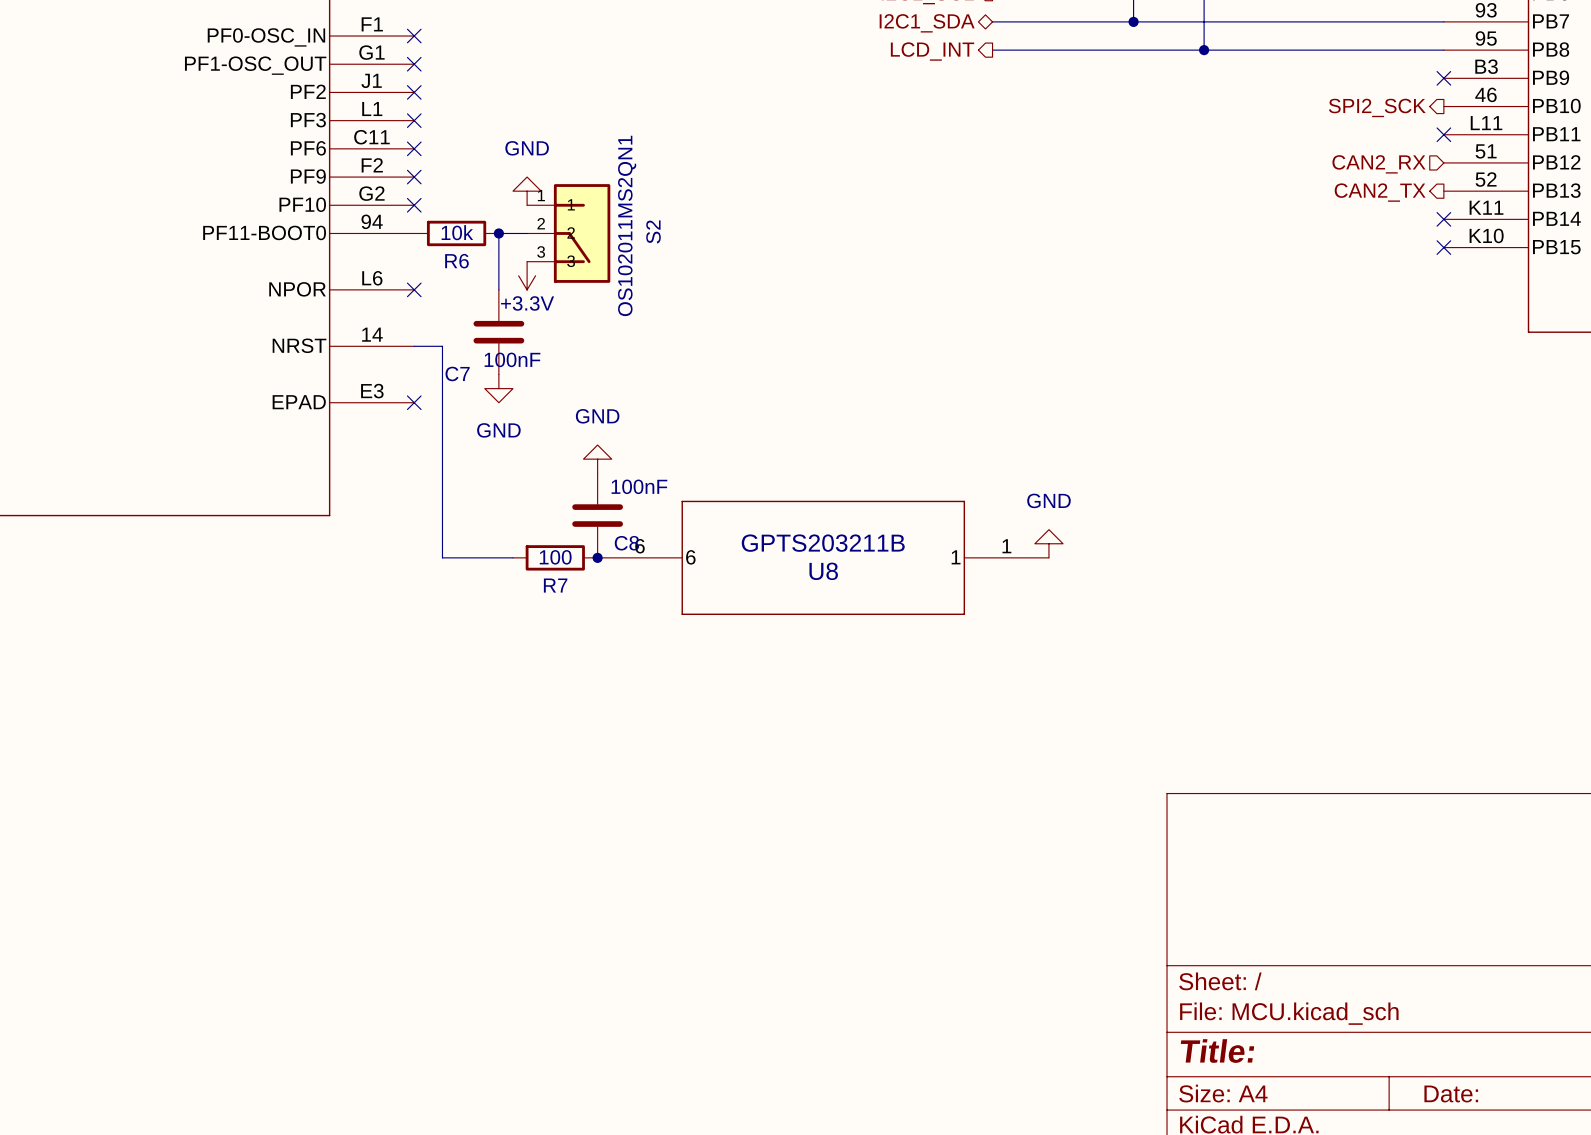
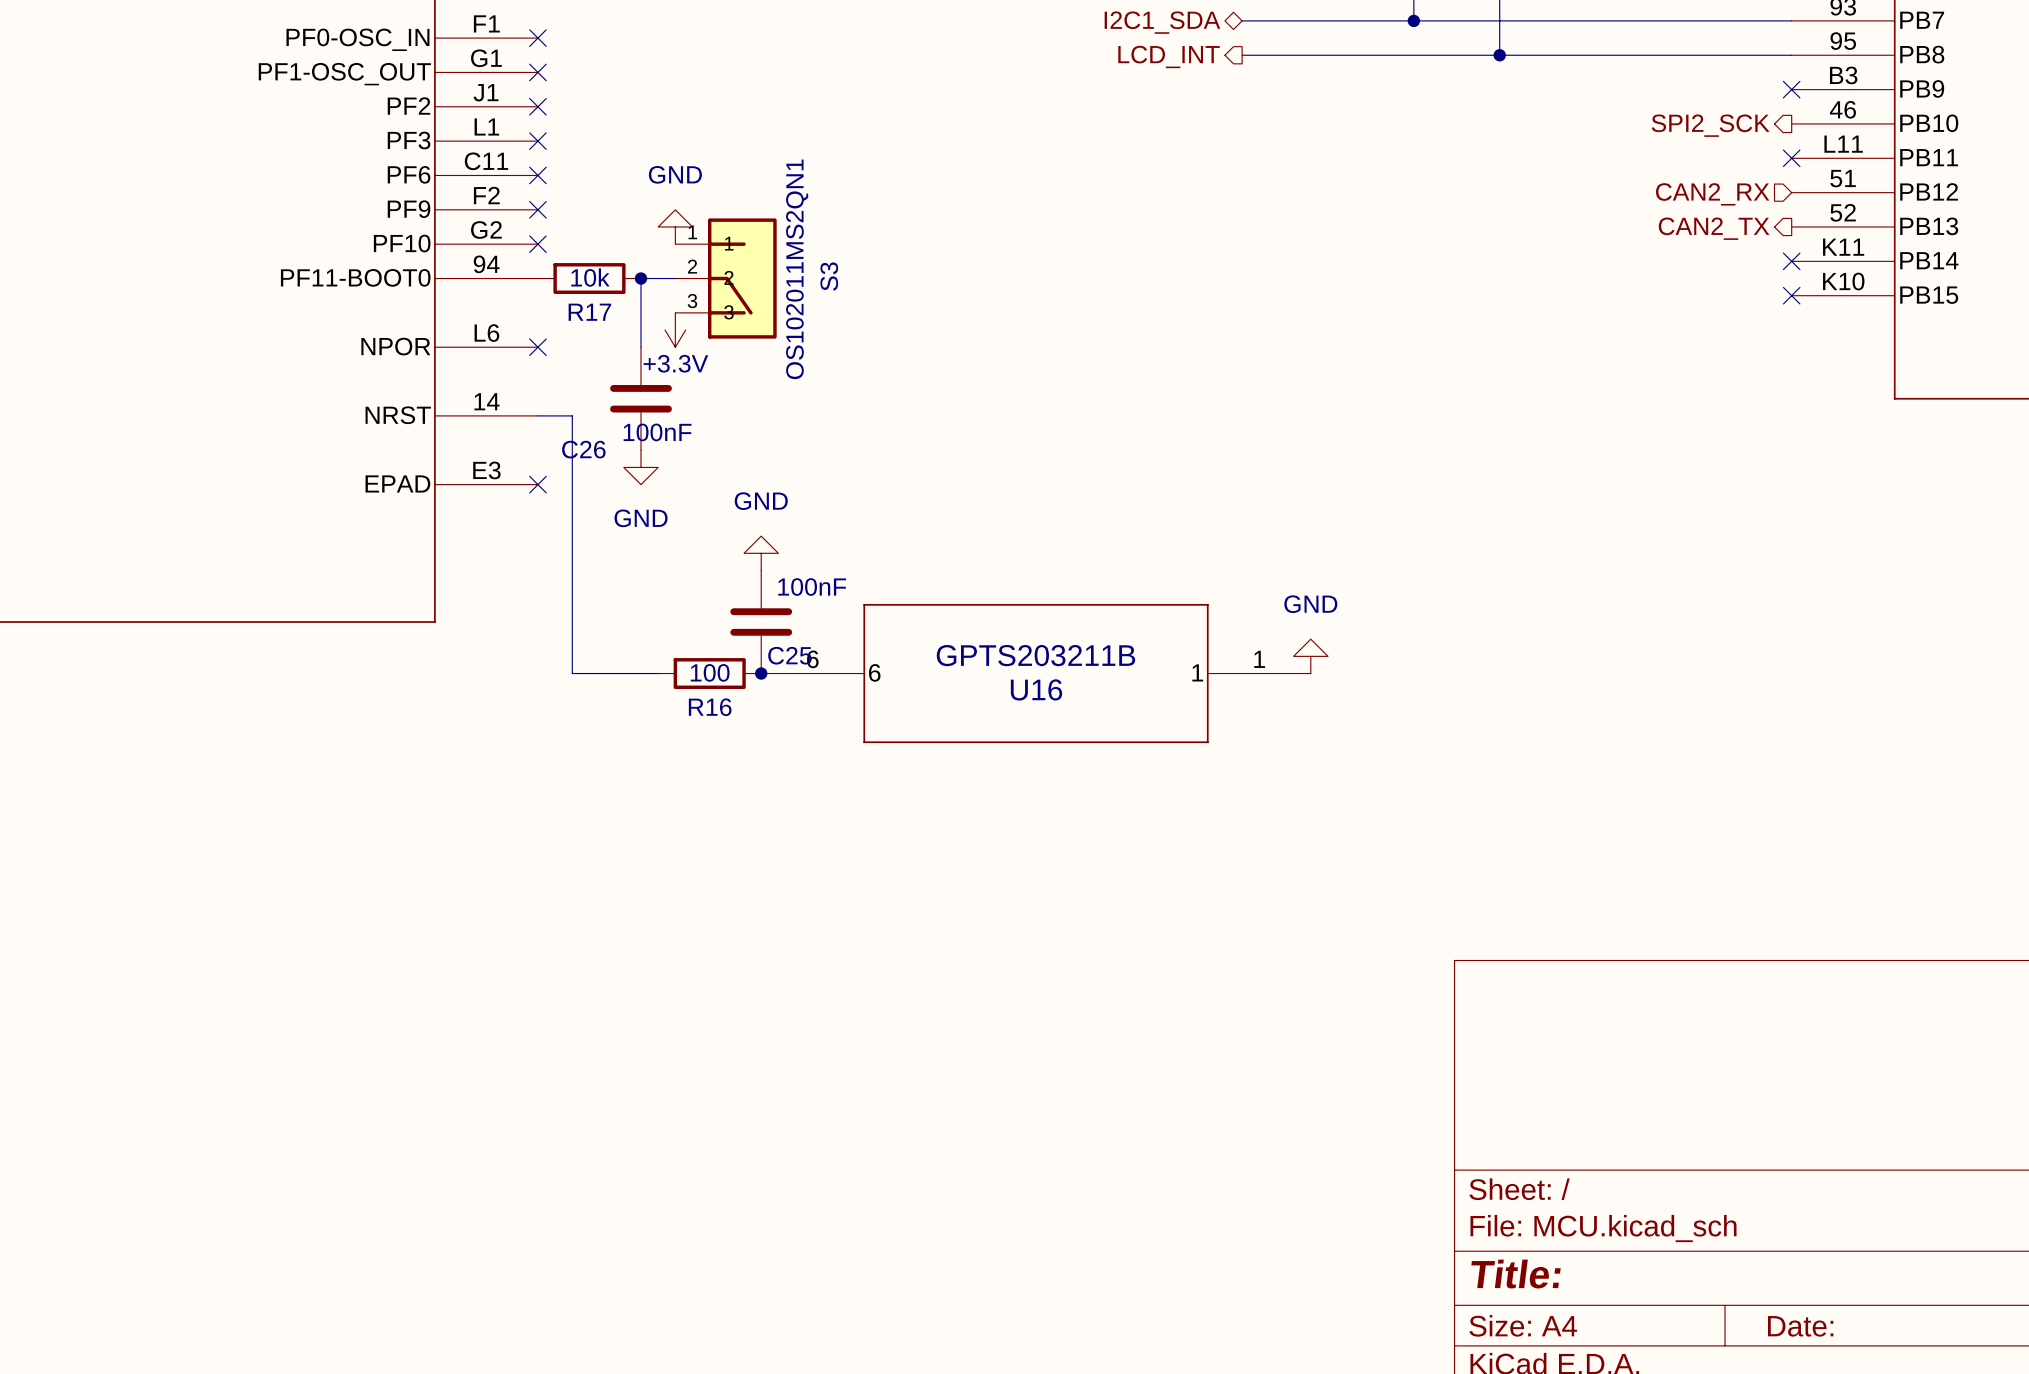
S2 name: S2 (653, 231) -> S3 (829, 276)
R6 name: R6 (456, 261) -> R17 (589, 312)
C7 name: C7 (457, 373) -> C26 (583, 449)
C8 name: C8 (626, 543) -> C25 (789, 655)
U8 name: U8 (823, 571) -> U16 (1036, 689)
R7 name: R7 (555, 585) -> R16 (710, 707)

